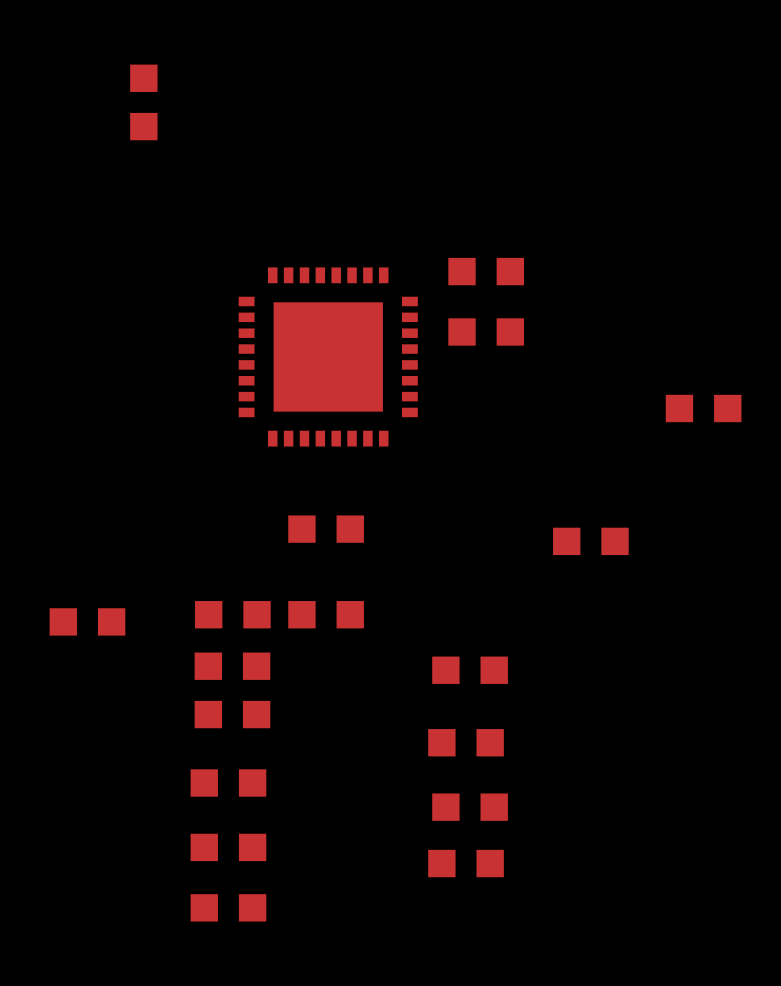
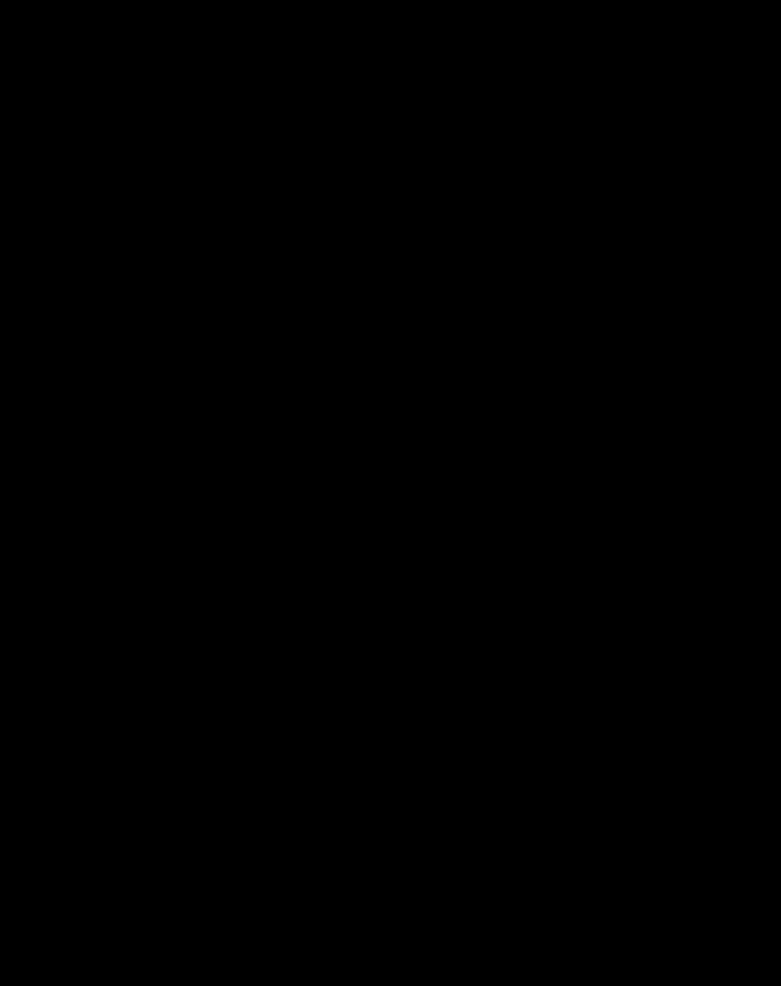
part: (143, 102) -> none
part: (486, 271) -> none
part: (486, 331) -> none
part: (328, 356) -> none
part: (703, 408) -> none
part: (326, 529) -> none
part: (590, 541) -> none
part: (232, 614) -> none
part: (326, 614) -> none
part: (87, 621) -> none
part: (232, 666) -> none
part: (470, 670) -> none
part: (232, 714) -> none
part: (466, 742) -> none
part: (228, 783) -> none
part: (470, 807) -> none
part: (228, 847) -> none
part: (466, 863) -> none
part: (228, 907) -> none

